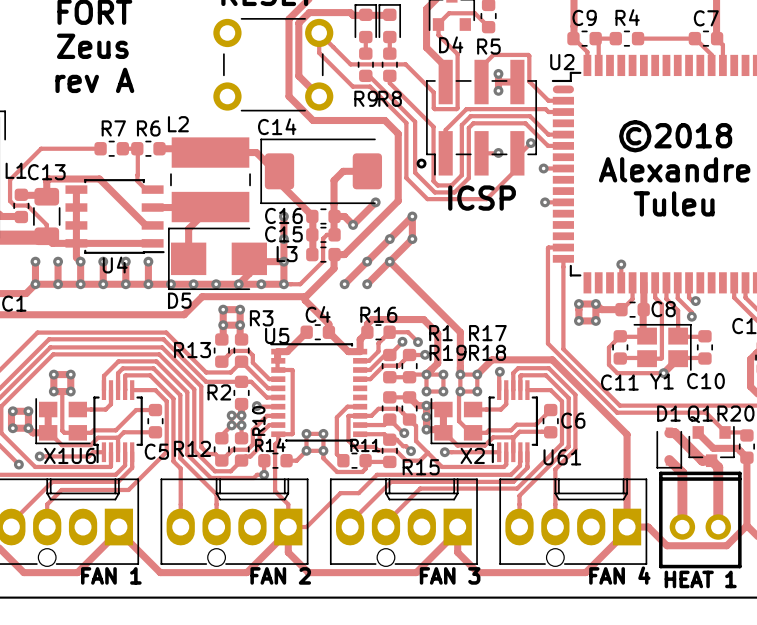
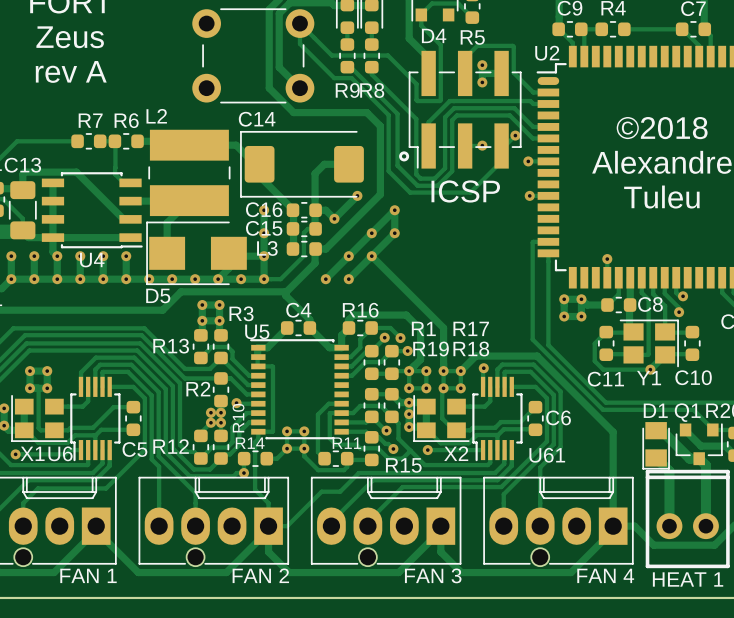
D1 footprint: [656, 427, 683, 469] -> [642, 422, 670, 470]

